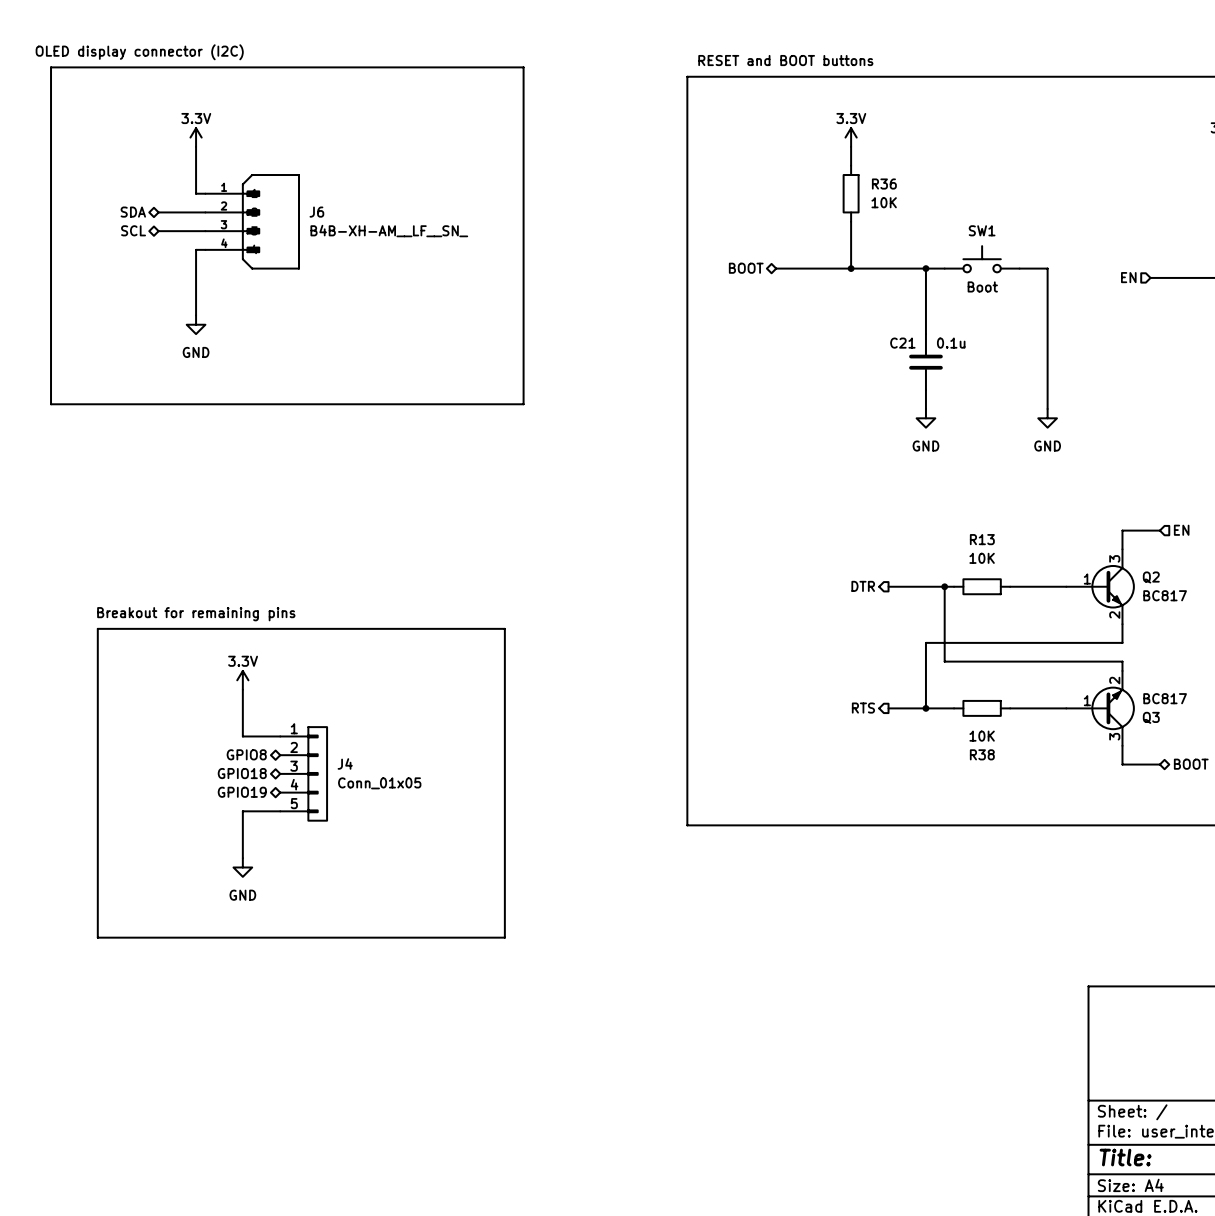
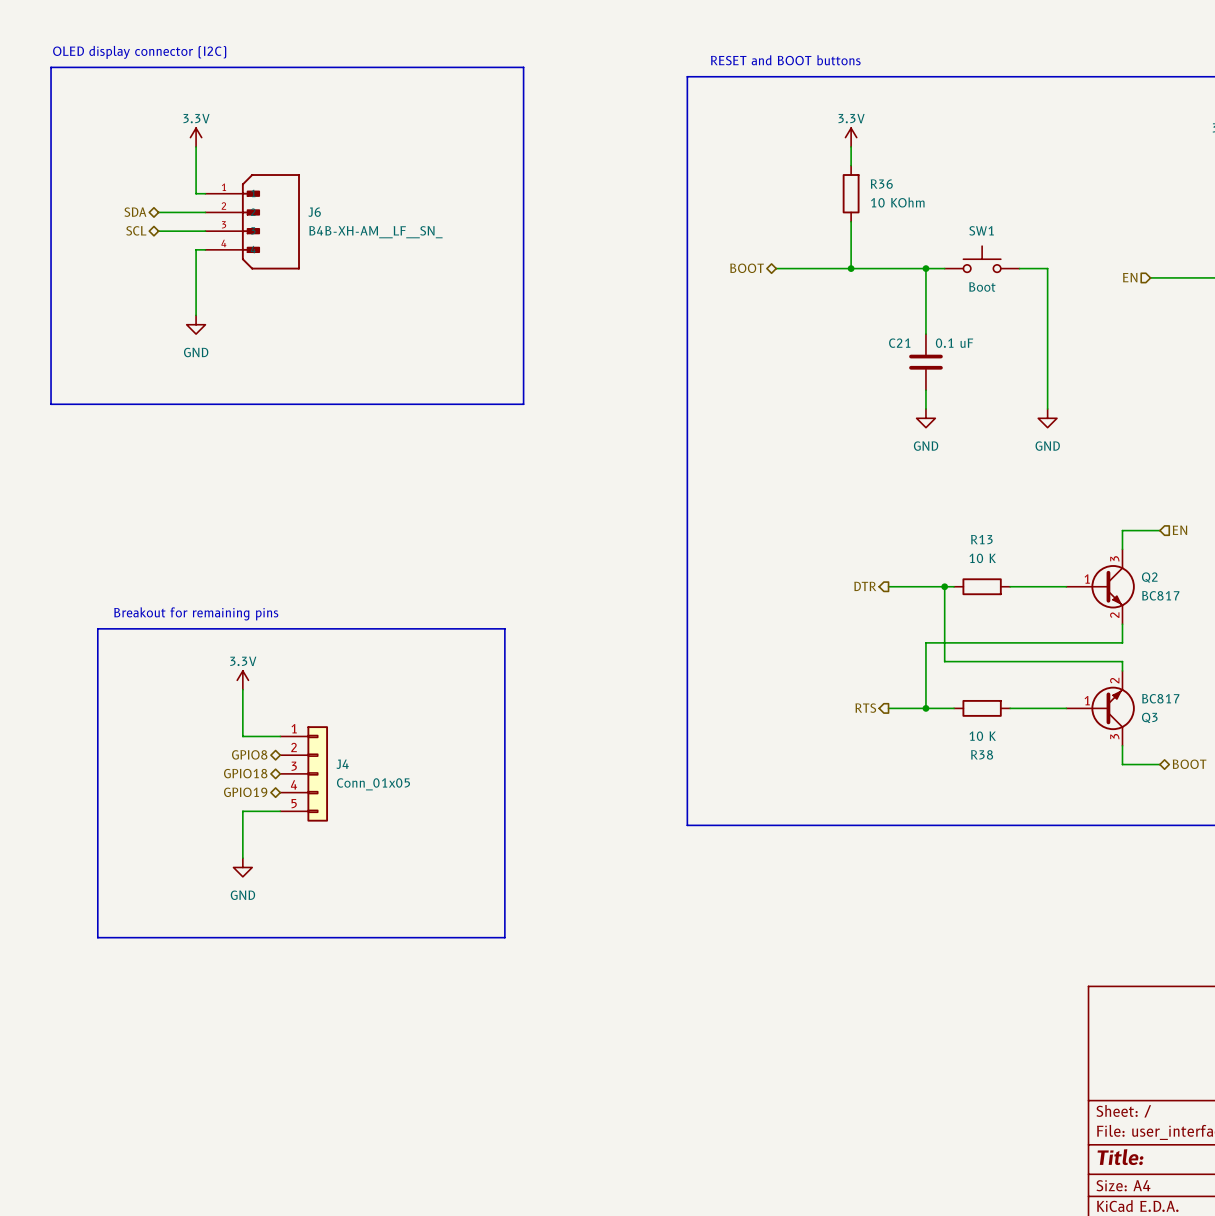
R36 value: 10K (884, 202) -> 10 KOhm (897, 202)
C21 value: 0.1u (951, 343) -> 0.1 uF (954, 343)
R13 value: 10K (982, 558) -> 10 K (982, 558)
R38 value: 10K (982, 736) -> 10 K (982, 736)

